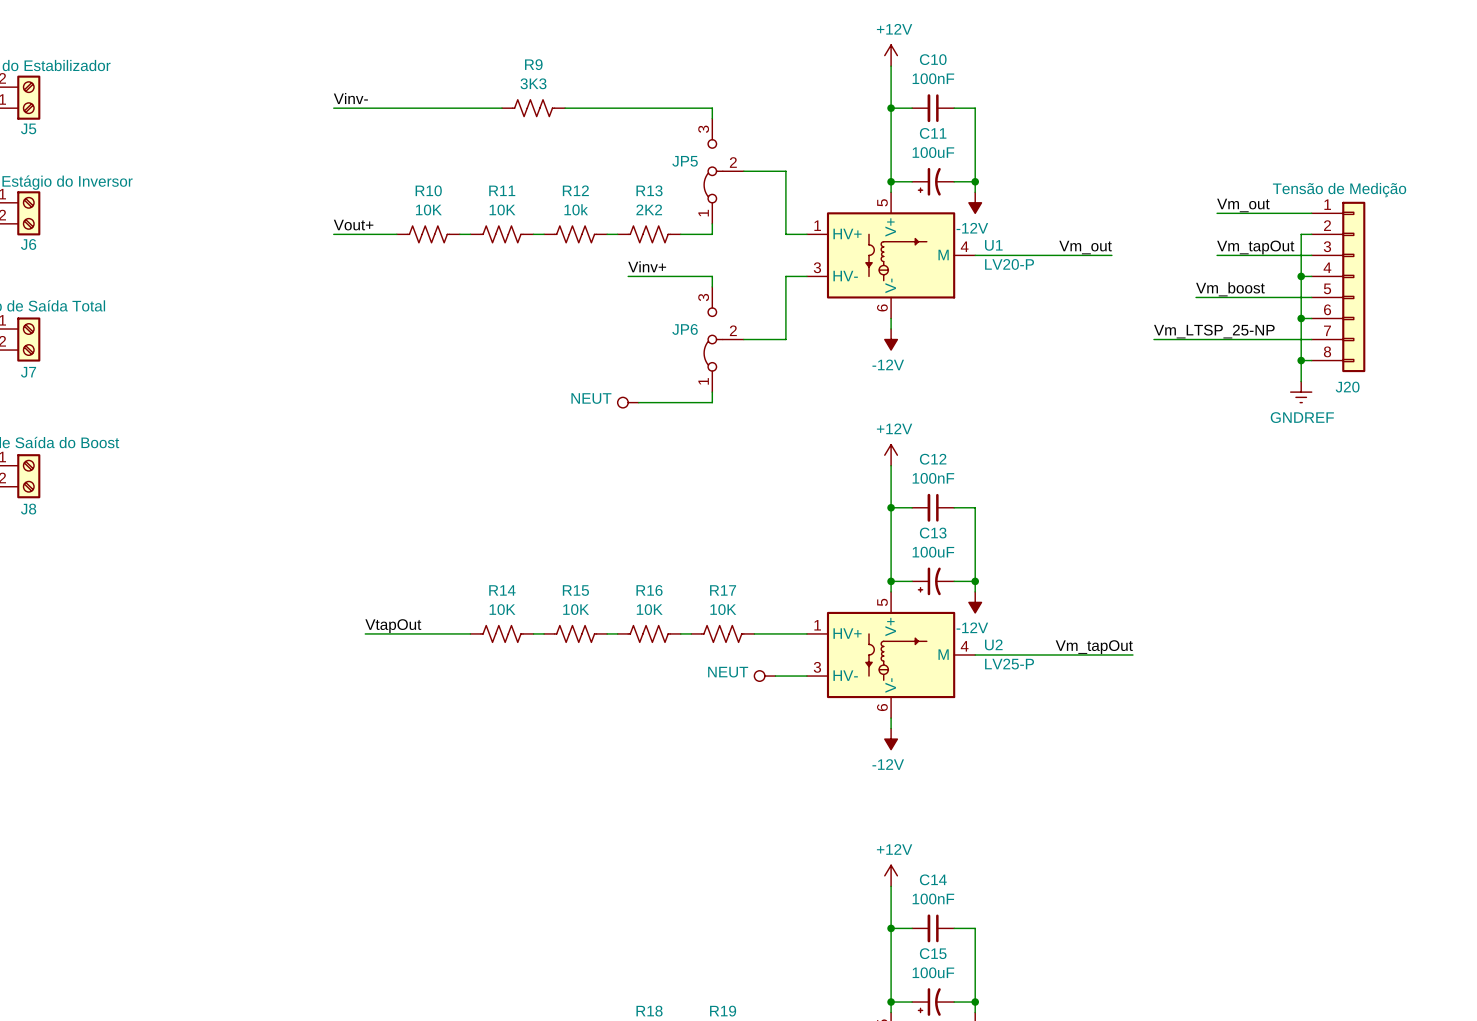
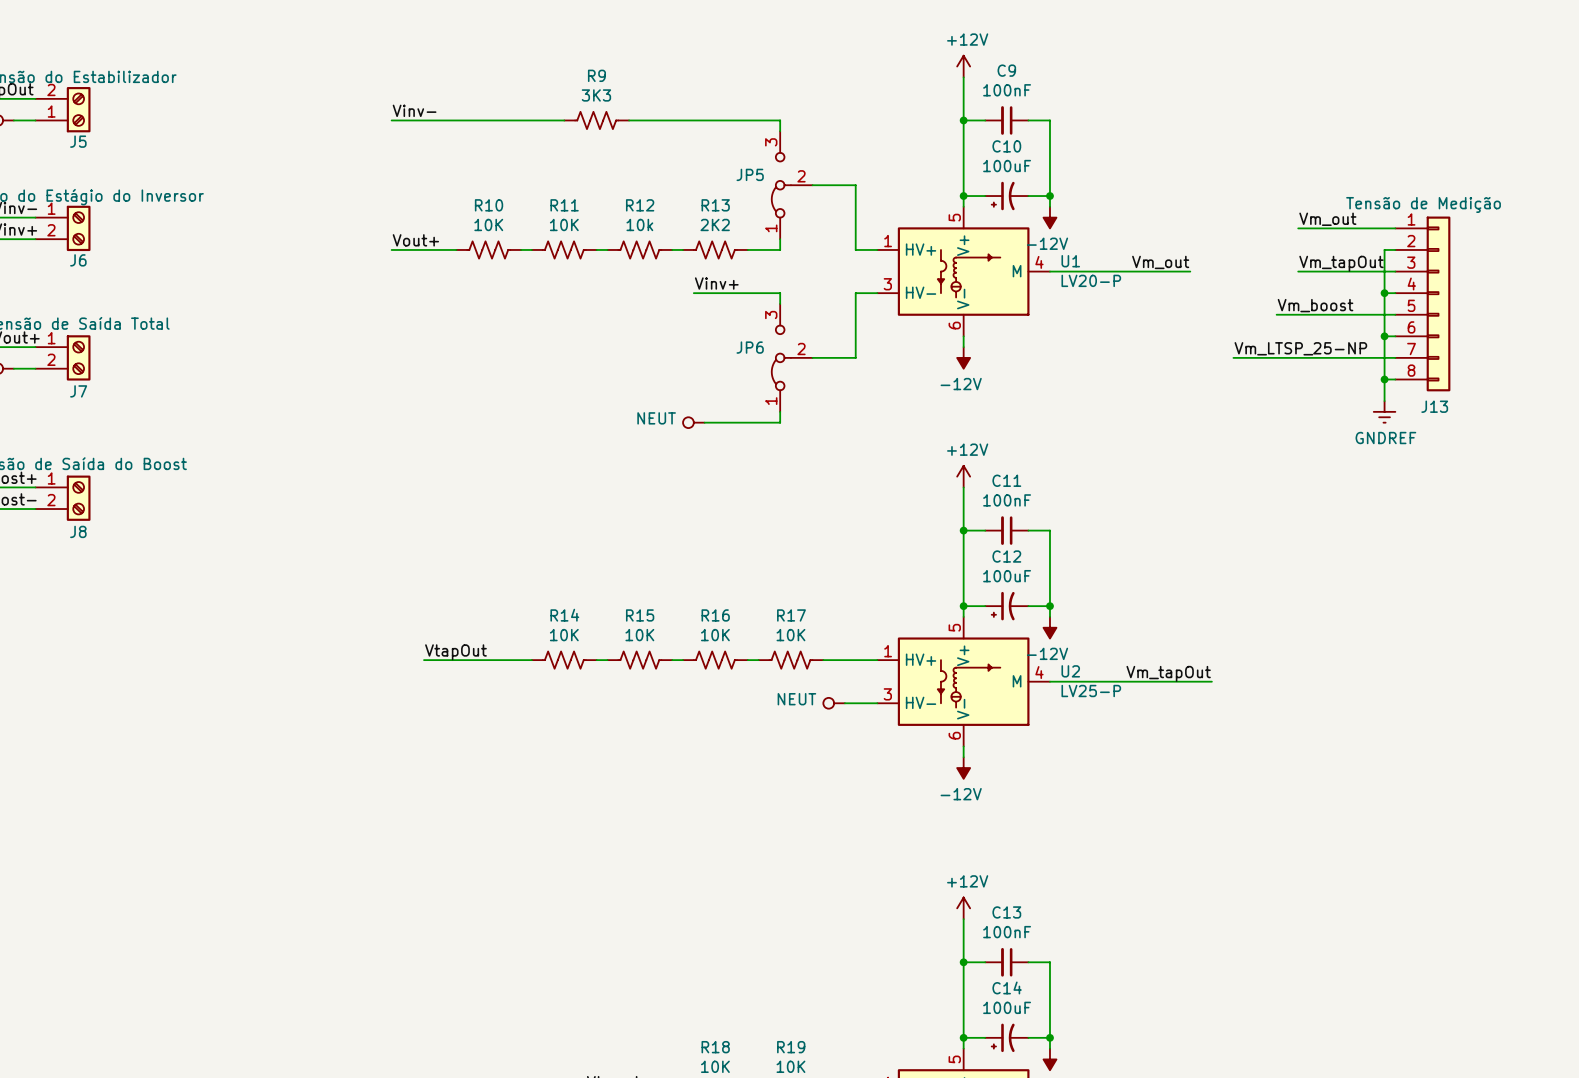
C10 name: C10 (933, 59) -> C9 (1006, 70)
C11 name: C11 (933, 133) -> C10 (1006, 146)
J20 name: J20 (1347, 387) -> J13 (1434, 406)
C12 name: C12 (933, 459) -> C11 (1006, 480)
C13 name: C13 (933, 533) -> C12 (1006, 556)
C14 name: C14 (933, 879) -> C13 (1006, 912)
C15 name: C15 (933, 953) -> C14 (1007, 987)

